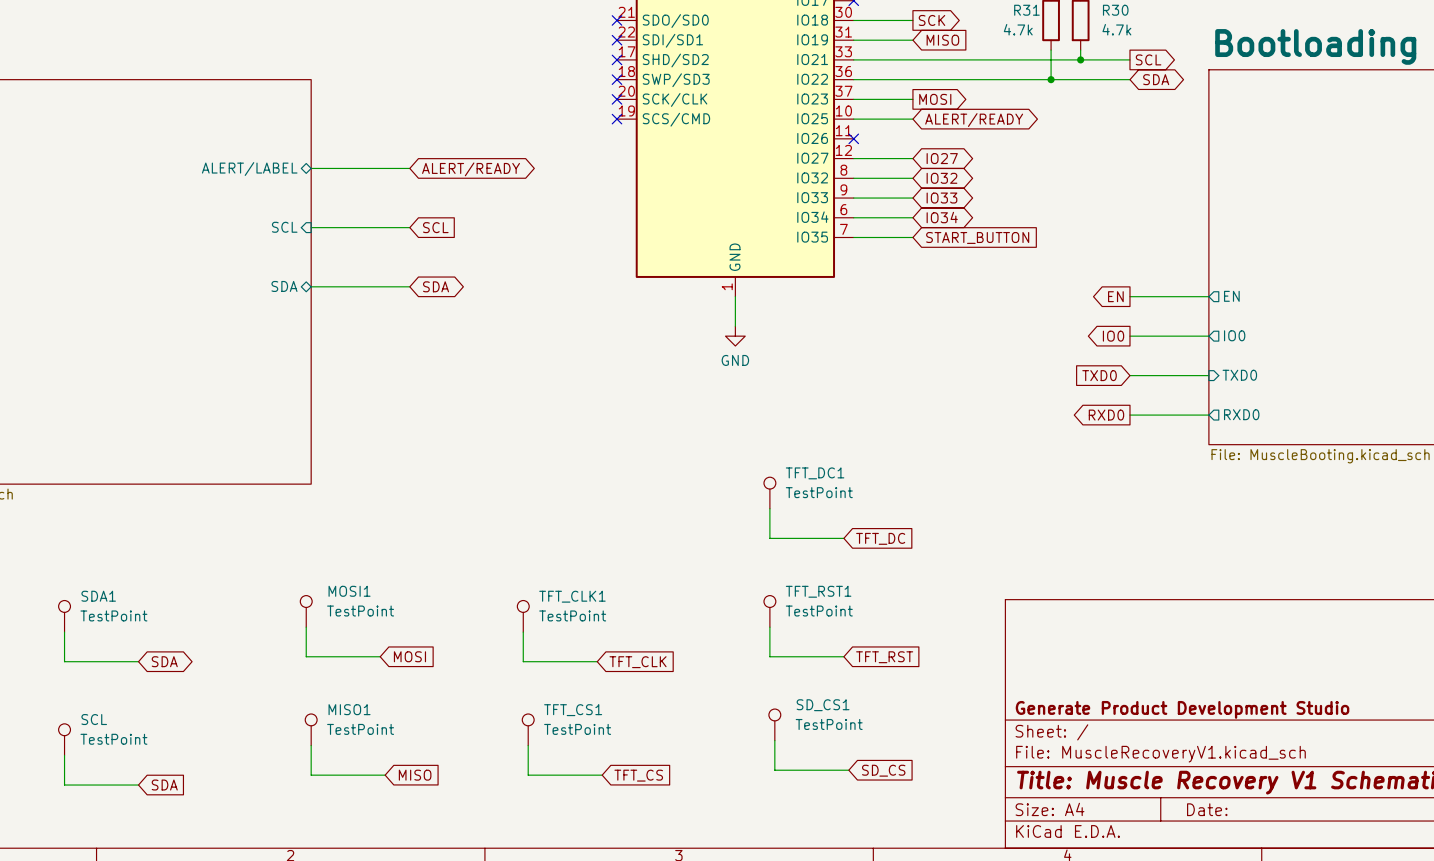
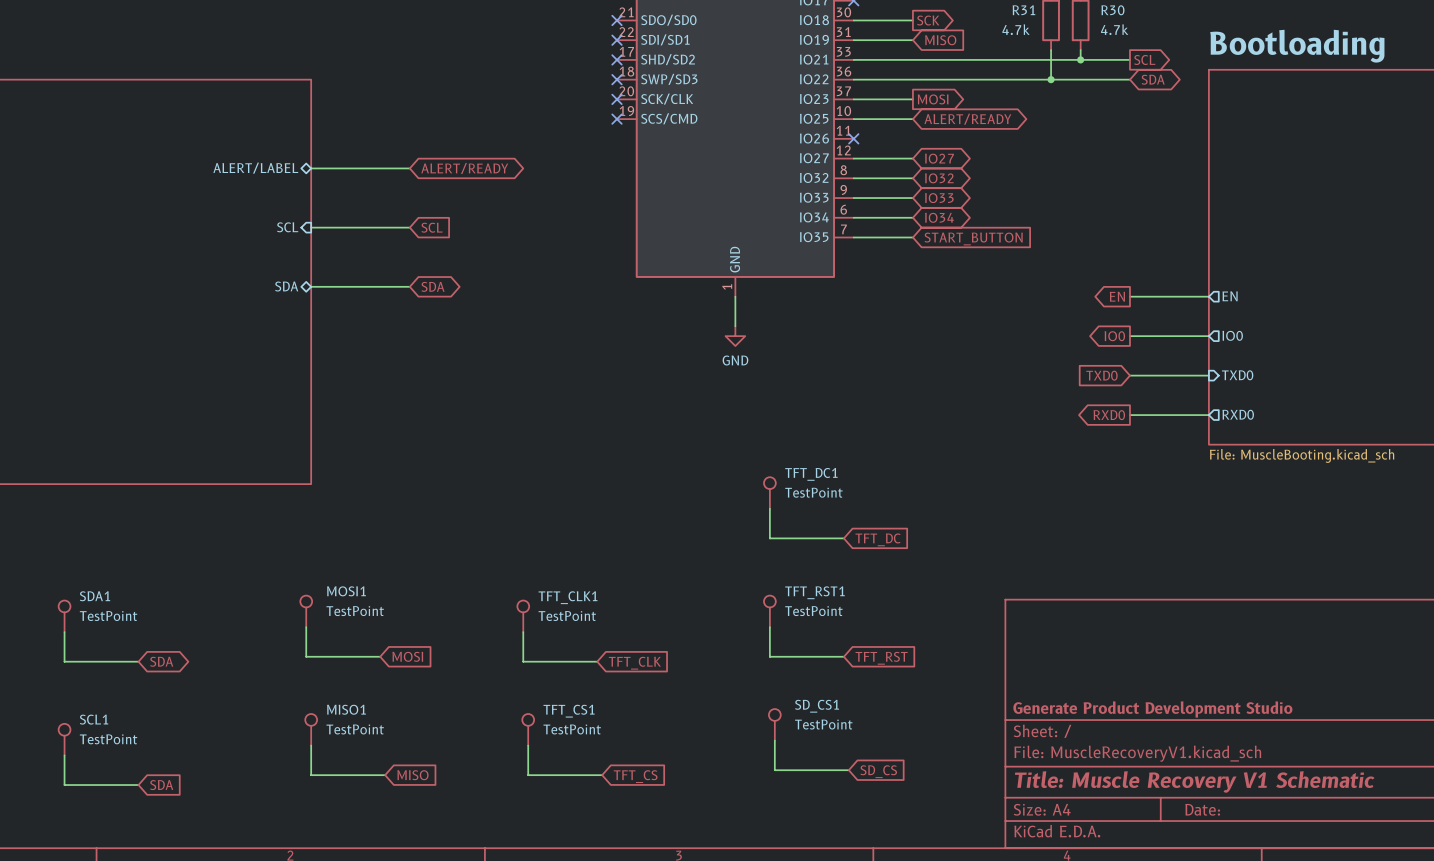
SCL name: SCL (94, 719) -> SCL1 (94, 719)

